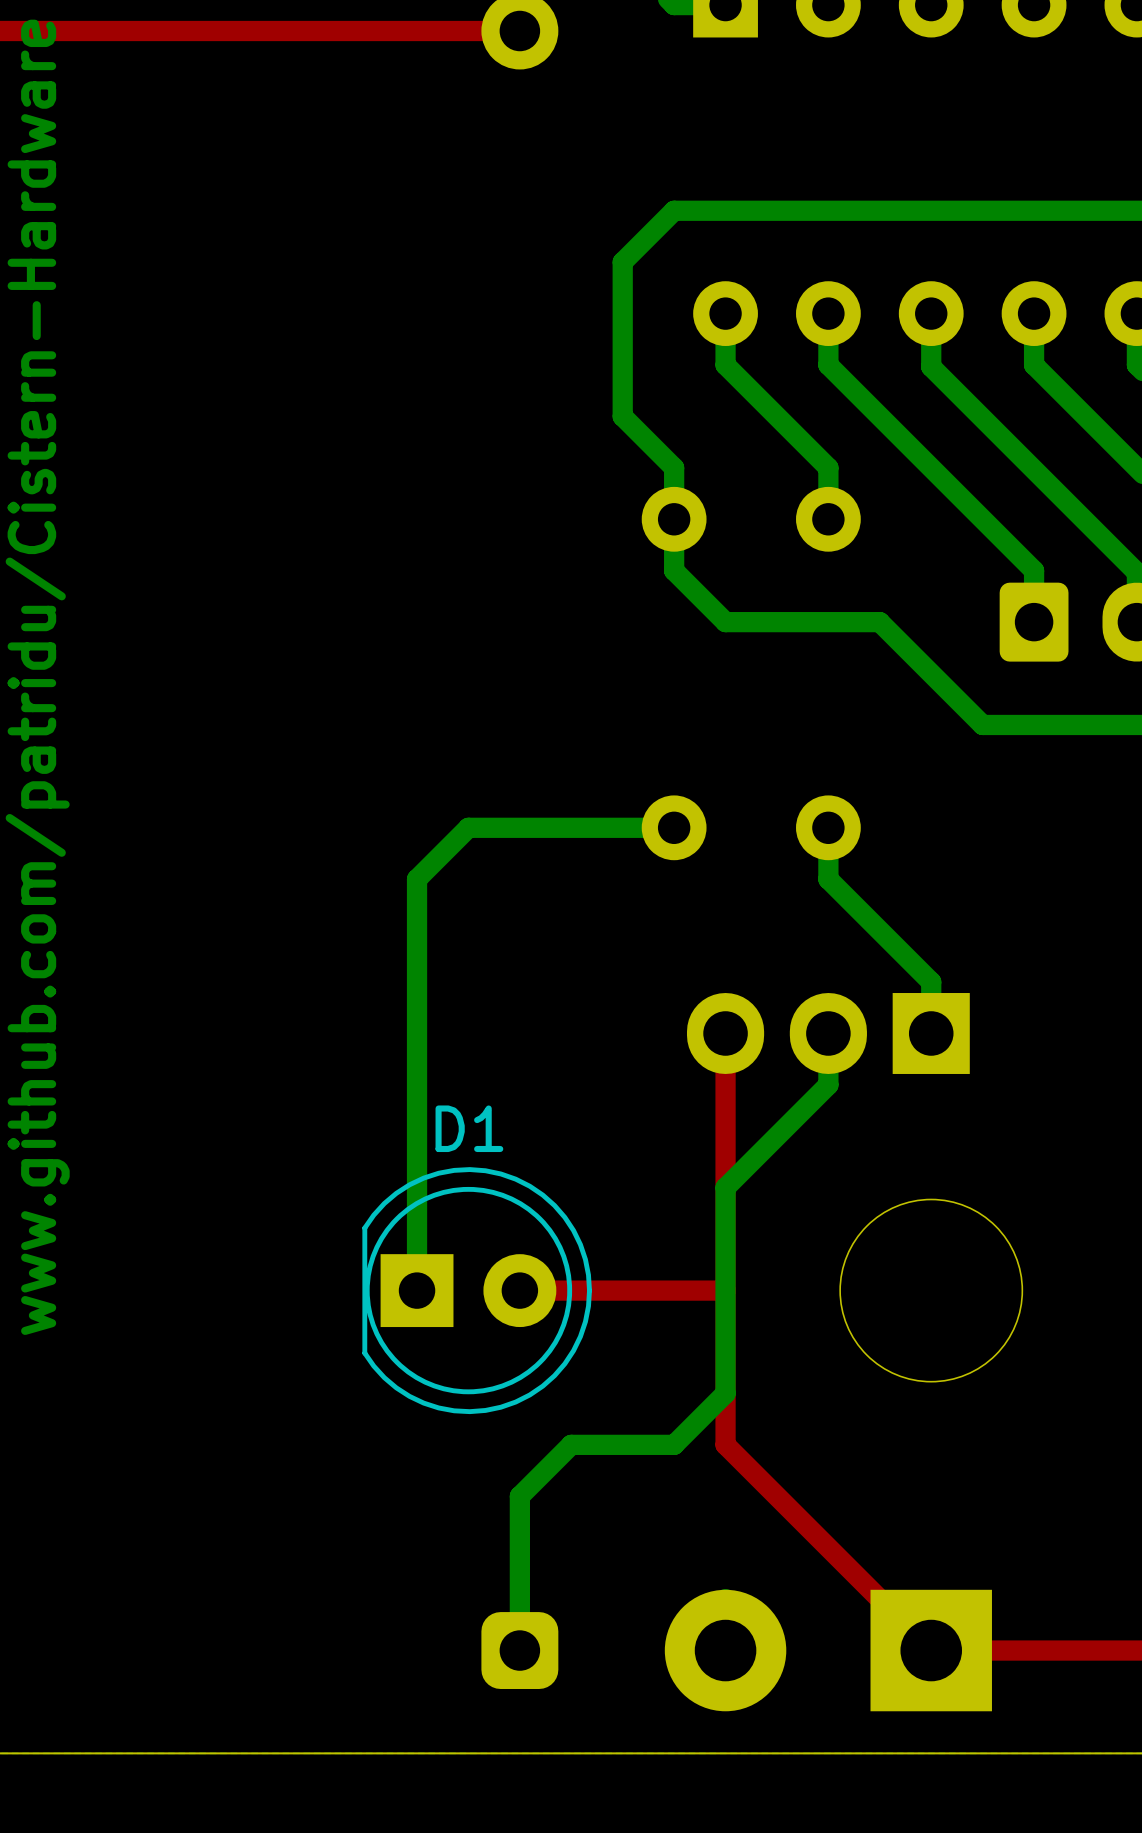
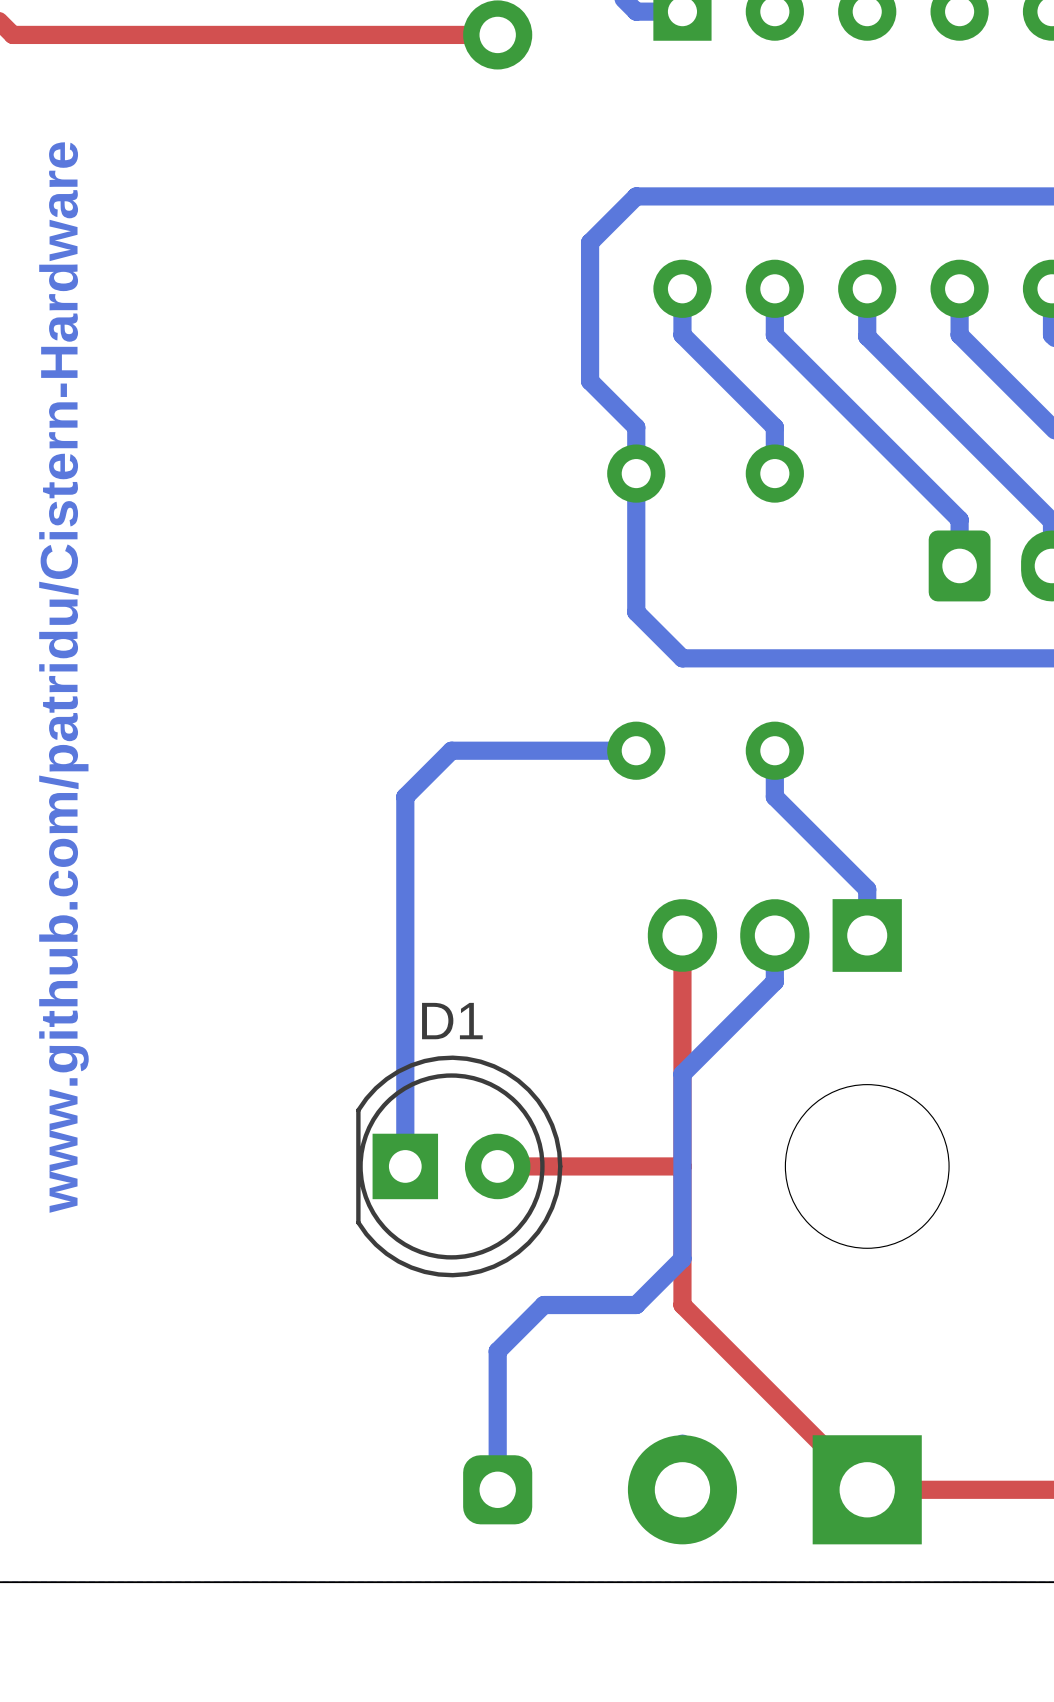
bottom track: (674, 570) (725, 622) (879, 622) (982, 724) -> (636, 519) (636, 612) (682, 658) (913, 658)

